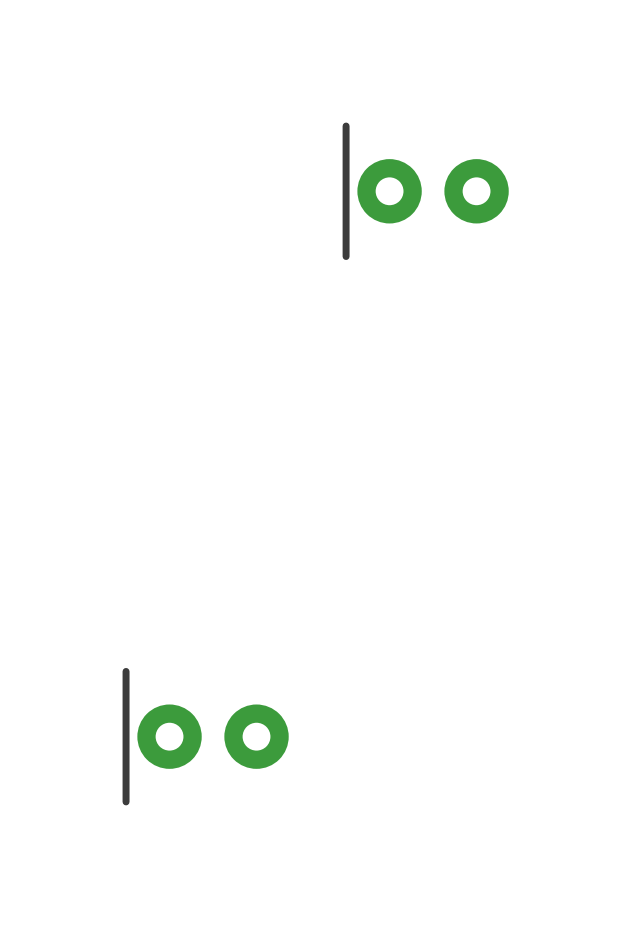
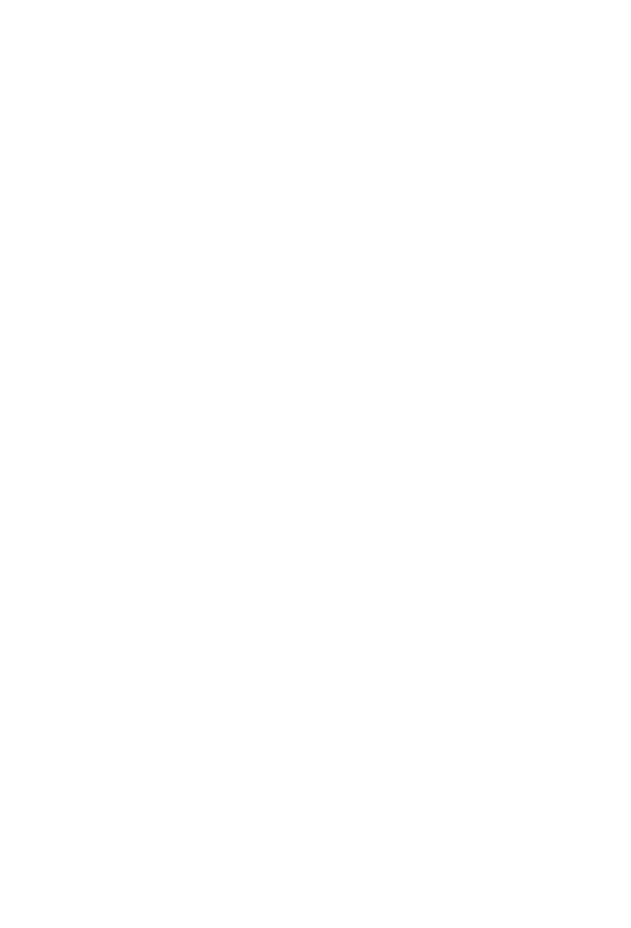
part: (425, 191) -> none
part: (205, 736) -> none

